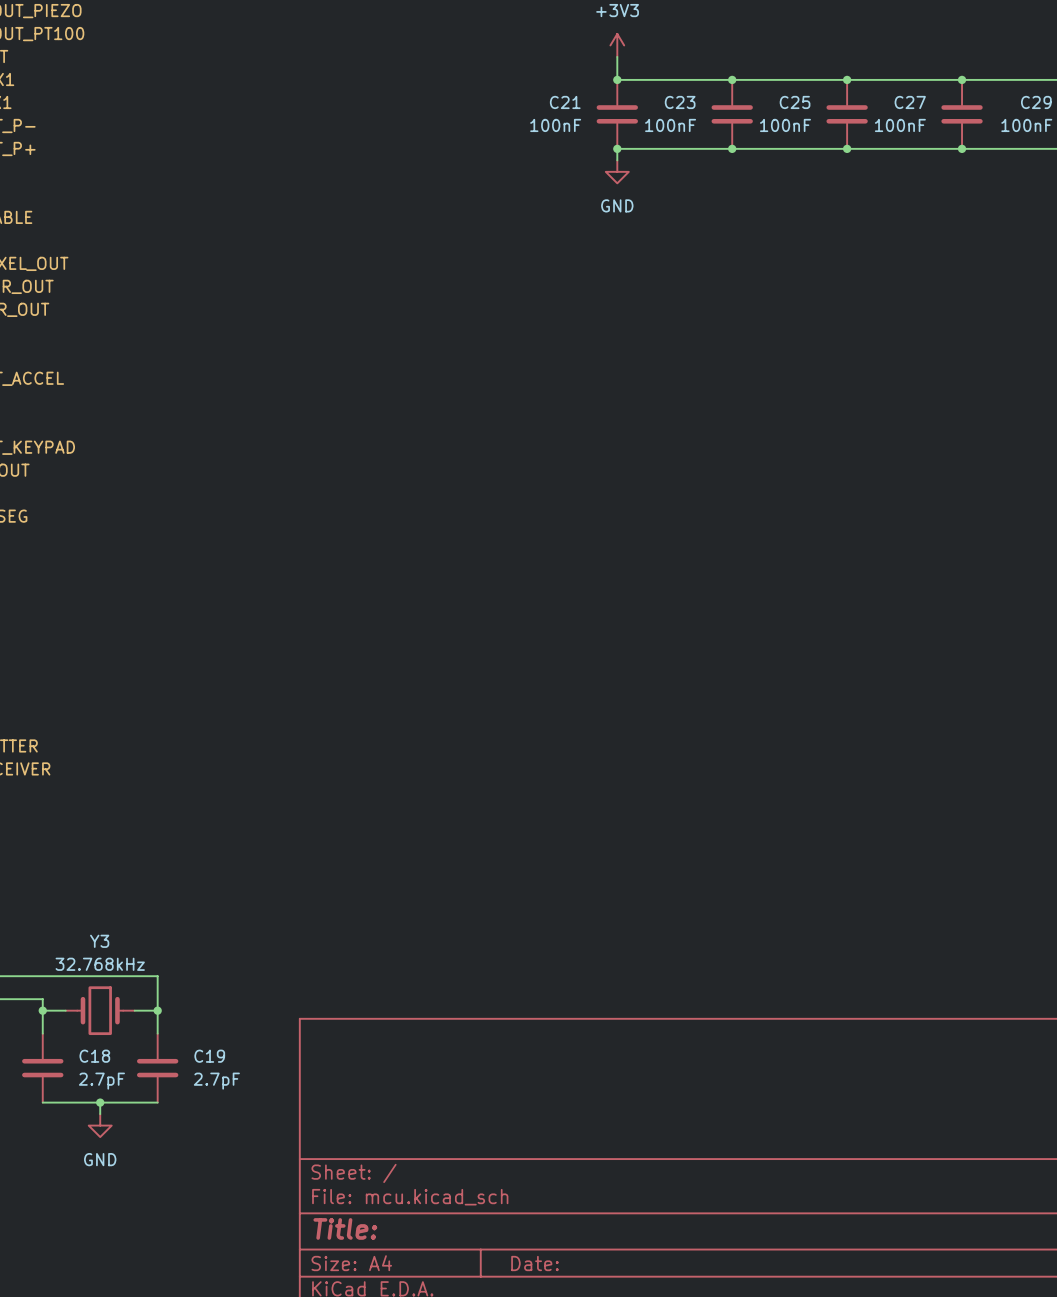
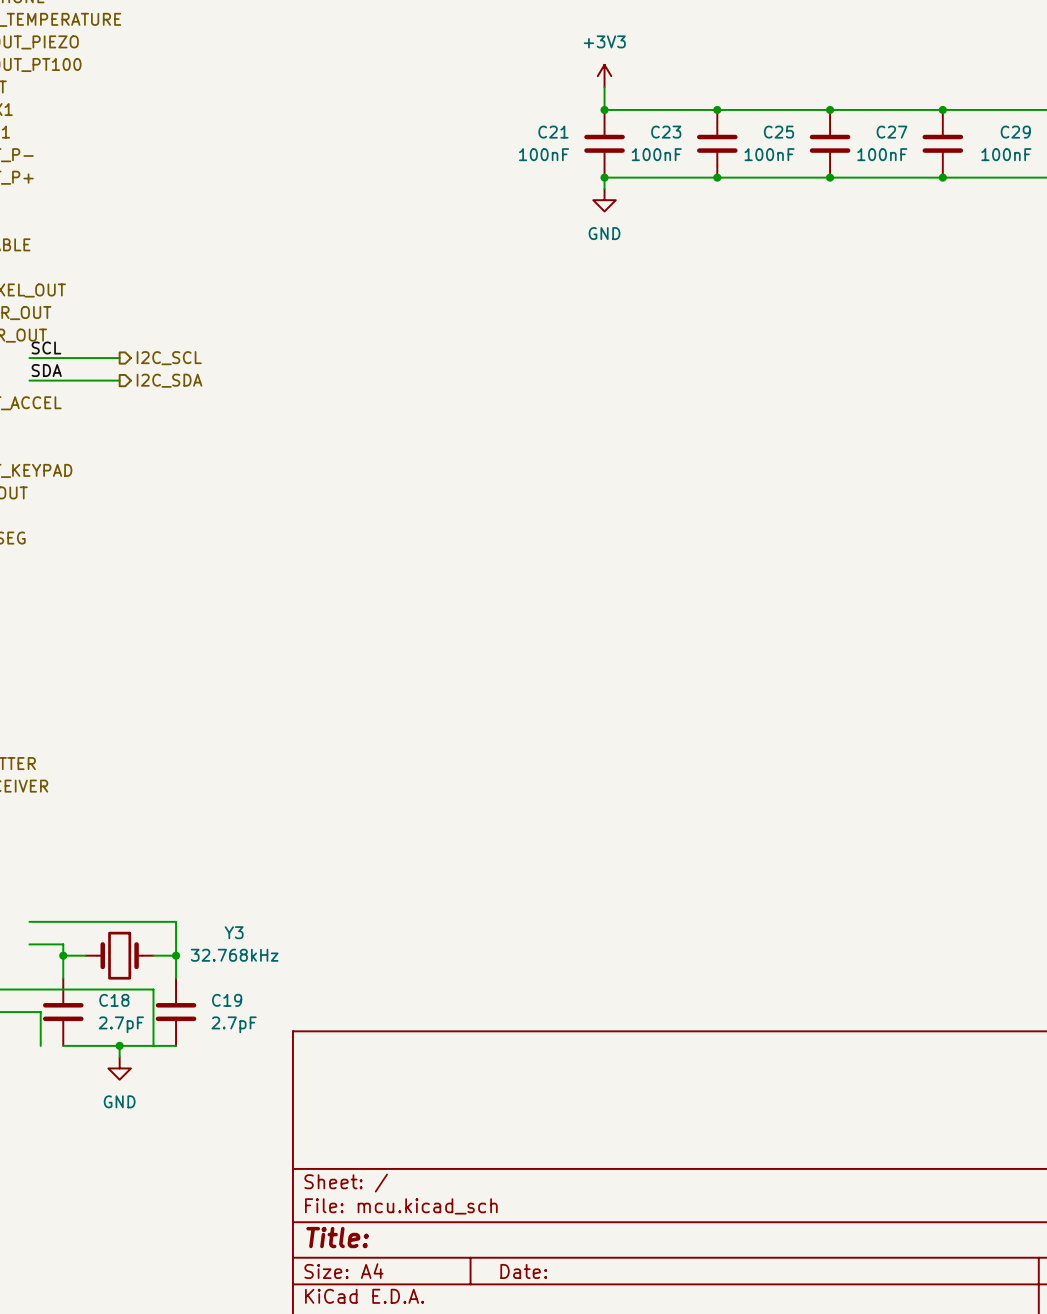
label: none -> SCL (46, 347)
wire: none -> (29, 358) (119, 358)
hierarchical label: none -> I2C_SCL (169, 358)
label: none -> SDA (46, 370)
wire: none -> (29, 380) (119, 380)
hierarchical label: none -> I2C_SDA (169, 380)
wire: none -> (29, 921) (176, 921) (176, 978)
wire: none -> (29, 944) (63, 944) (63, 978)
junction: none -> (63, 955)
Y3 name position: Y3 (99, 941) -> Y3 (234, 932)
junction: none -> (176, 955)
Y3 value position: 32.768kHz (100, 964) -> 32.768kHz (234, 955)
wire: (42, 1010) (65, 1010) -> (63, 955) (85, 955)
junction: (42, 1010) -> none
Y3 position: (100, 1010) -> (119, 955)
wire: (134, 1010) (157, 1010) -> (153, 955) (176, 955)
junction: (157, 1010) -> none
junction: none -> (119, 1045)
C18 position: (42, 1068) -> (63, 1012)
C19 position: (157, 1068) -> (176, 1012)
wire: (42, 1102) (157, 1102) -> (63, 1045) (176, 1045)
wire: (100, 1102) (100, 1114) -> (119, 1045) (119, 1057)
junction: (100, 1102) -> none
power symbol position: GND (100, 1125) -> GND (119, 1068)

